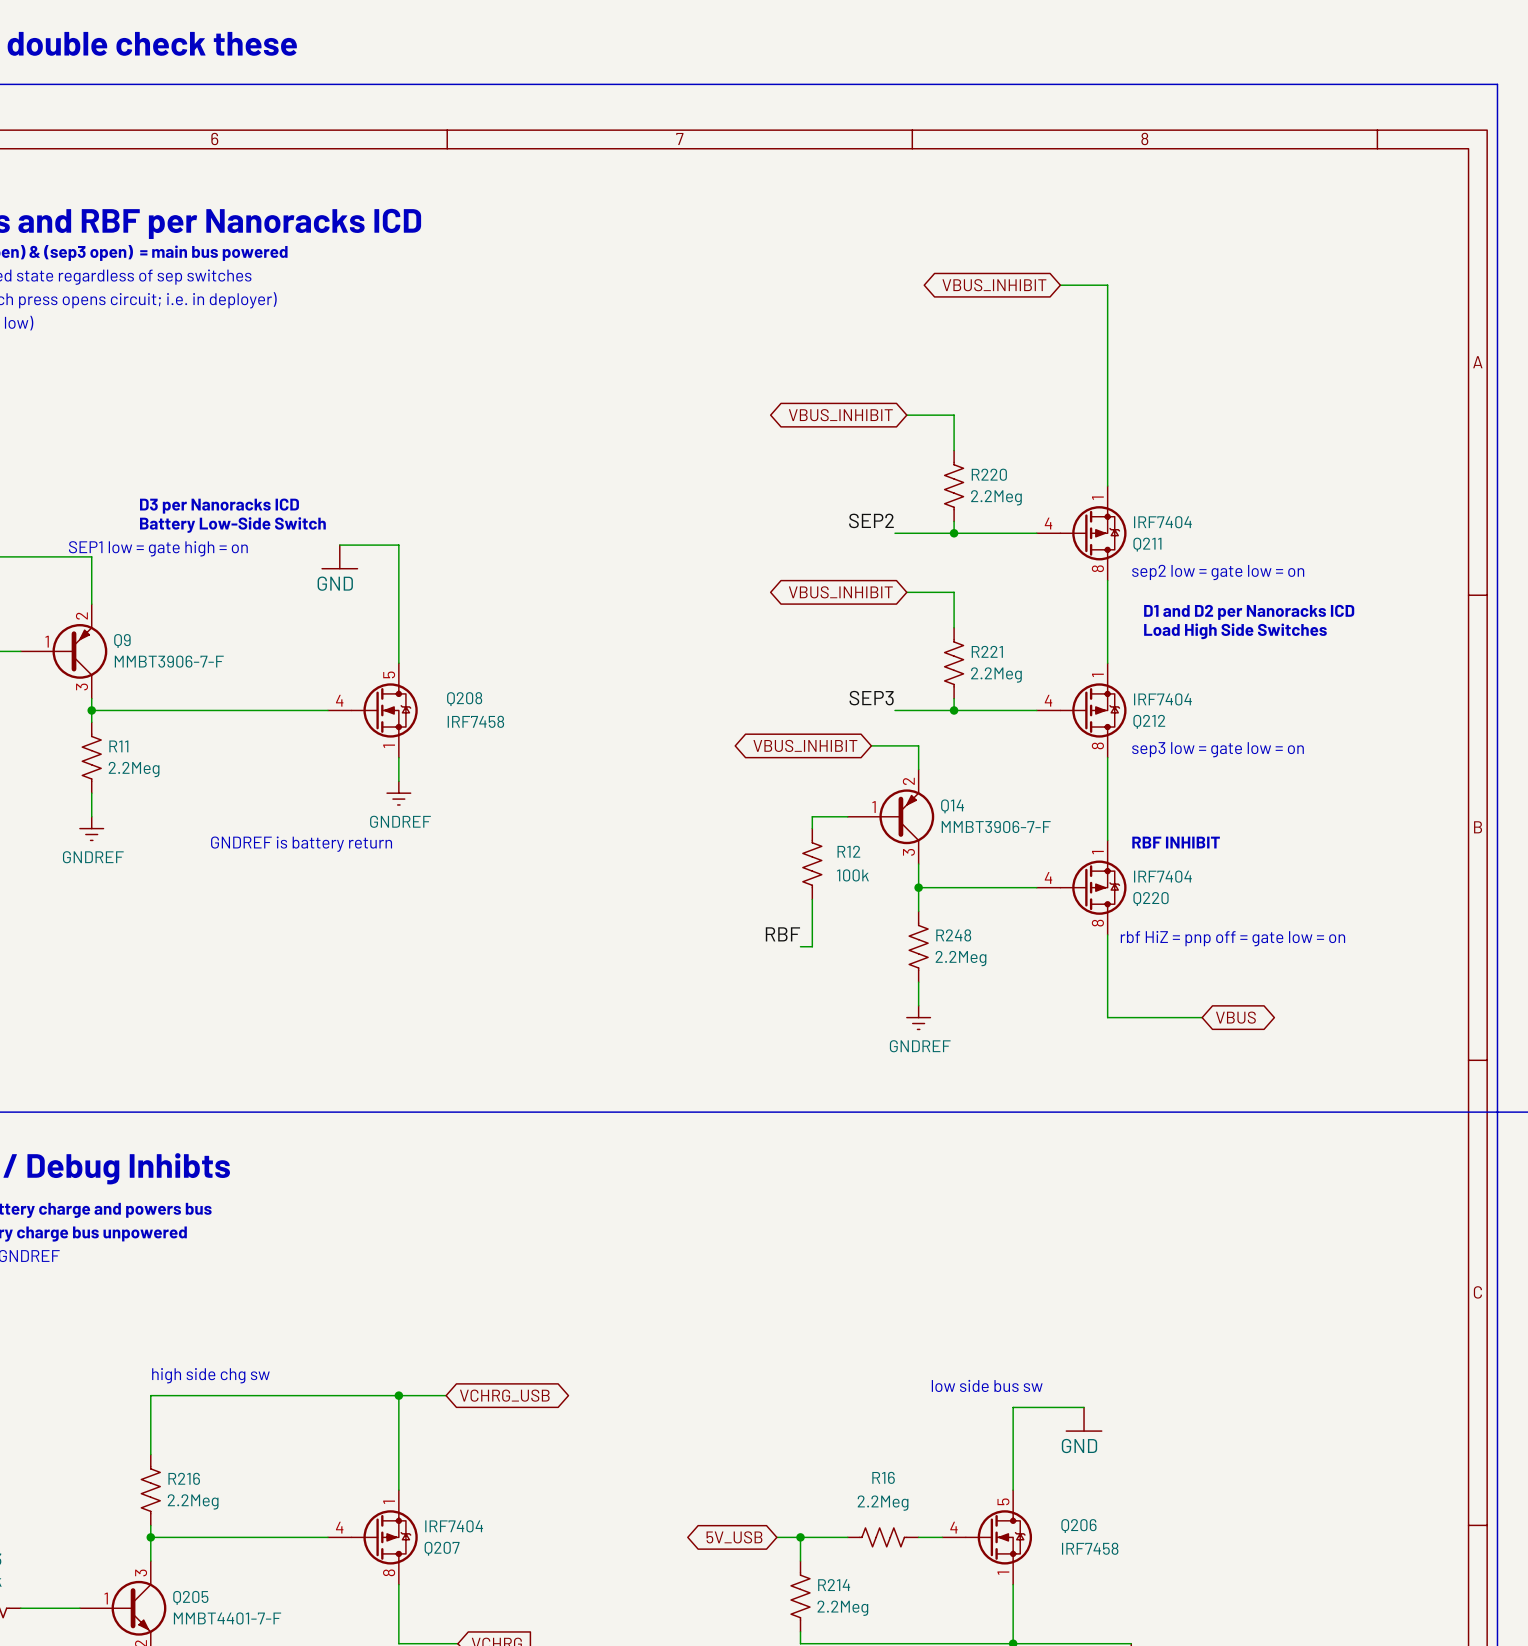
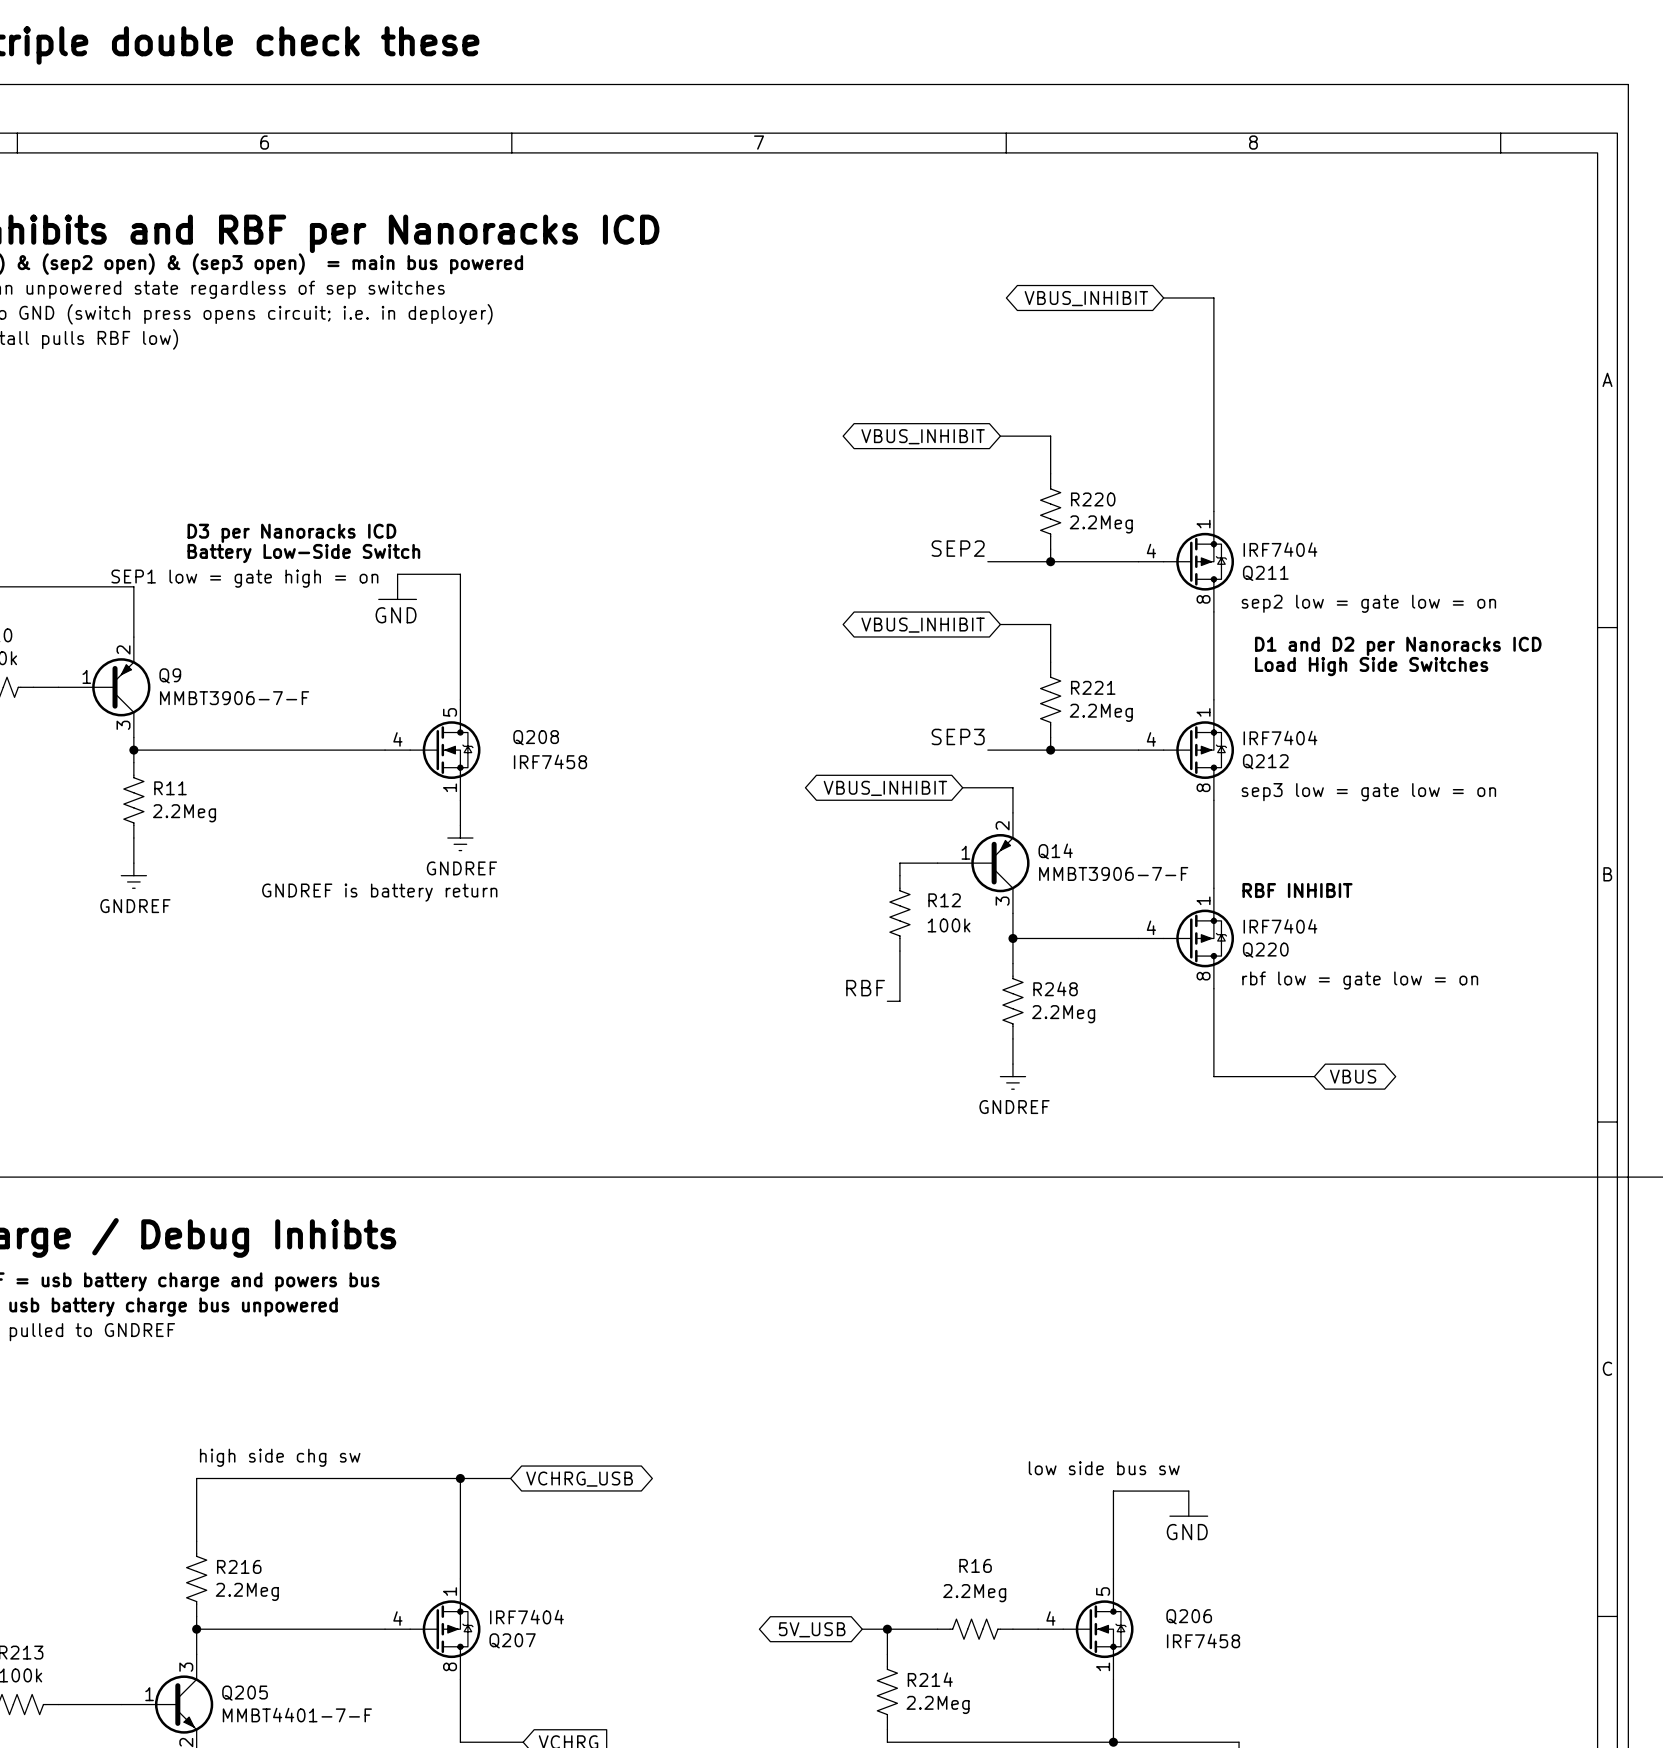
text: rbf HiZ = pnp off = gate low = on (1232, 938) -> rbf low = gate low = on (1360, 980)

